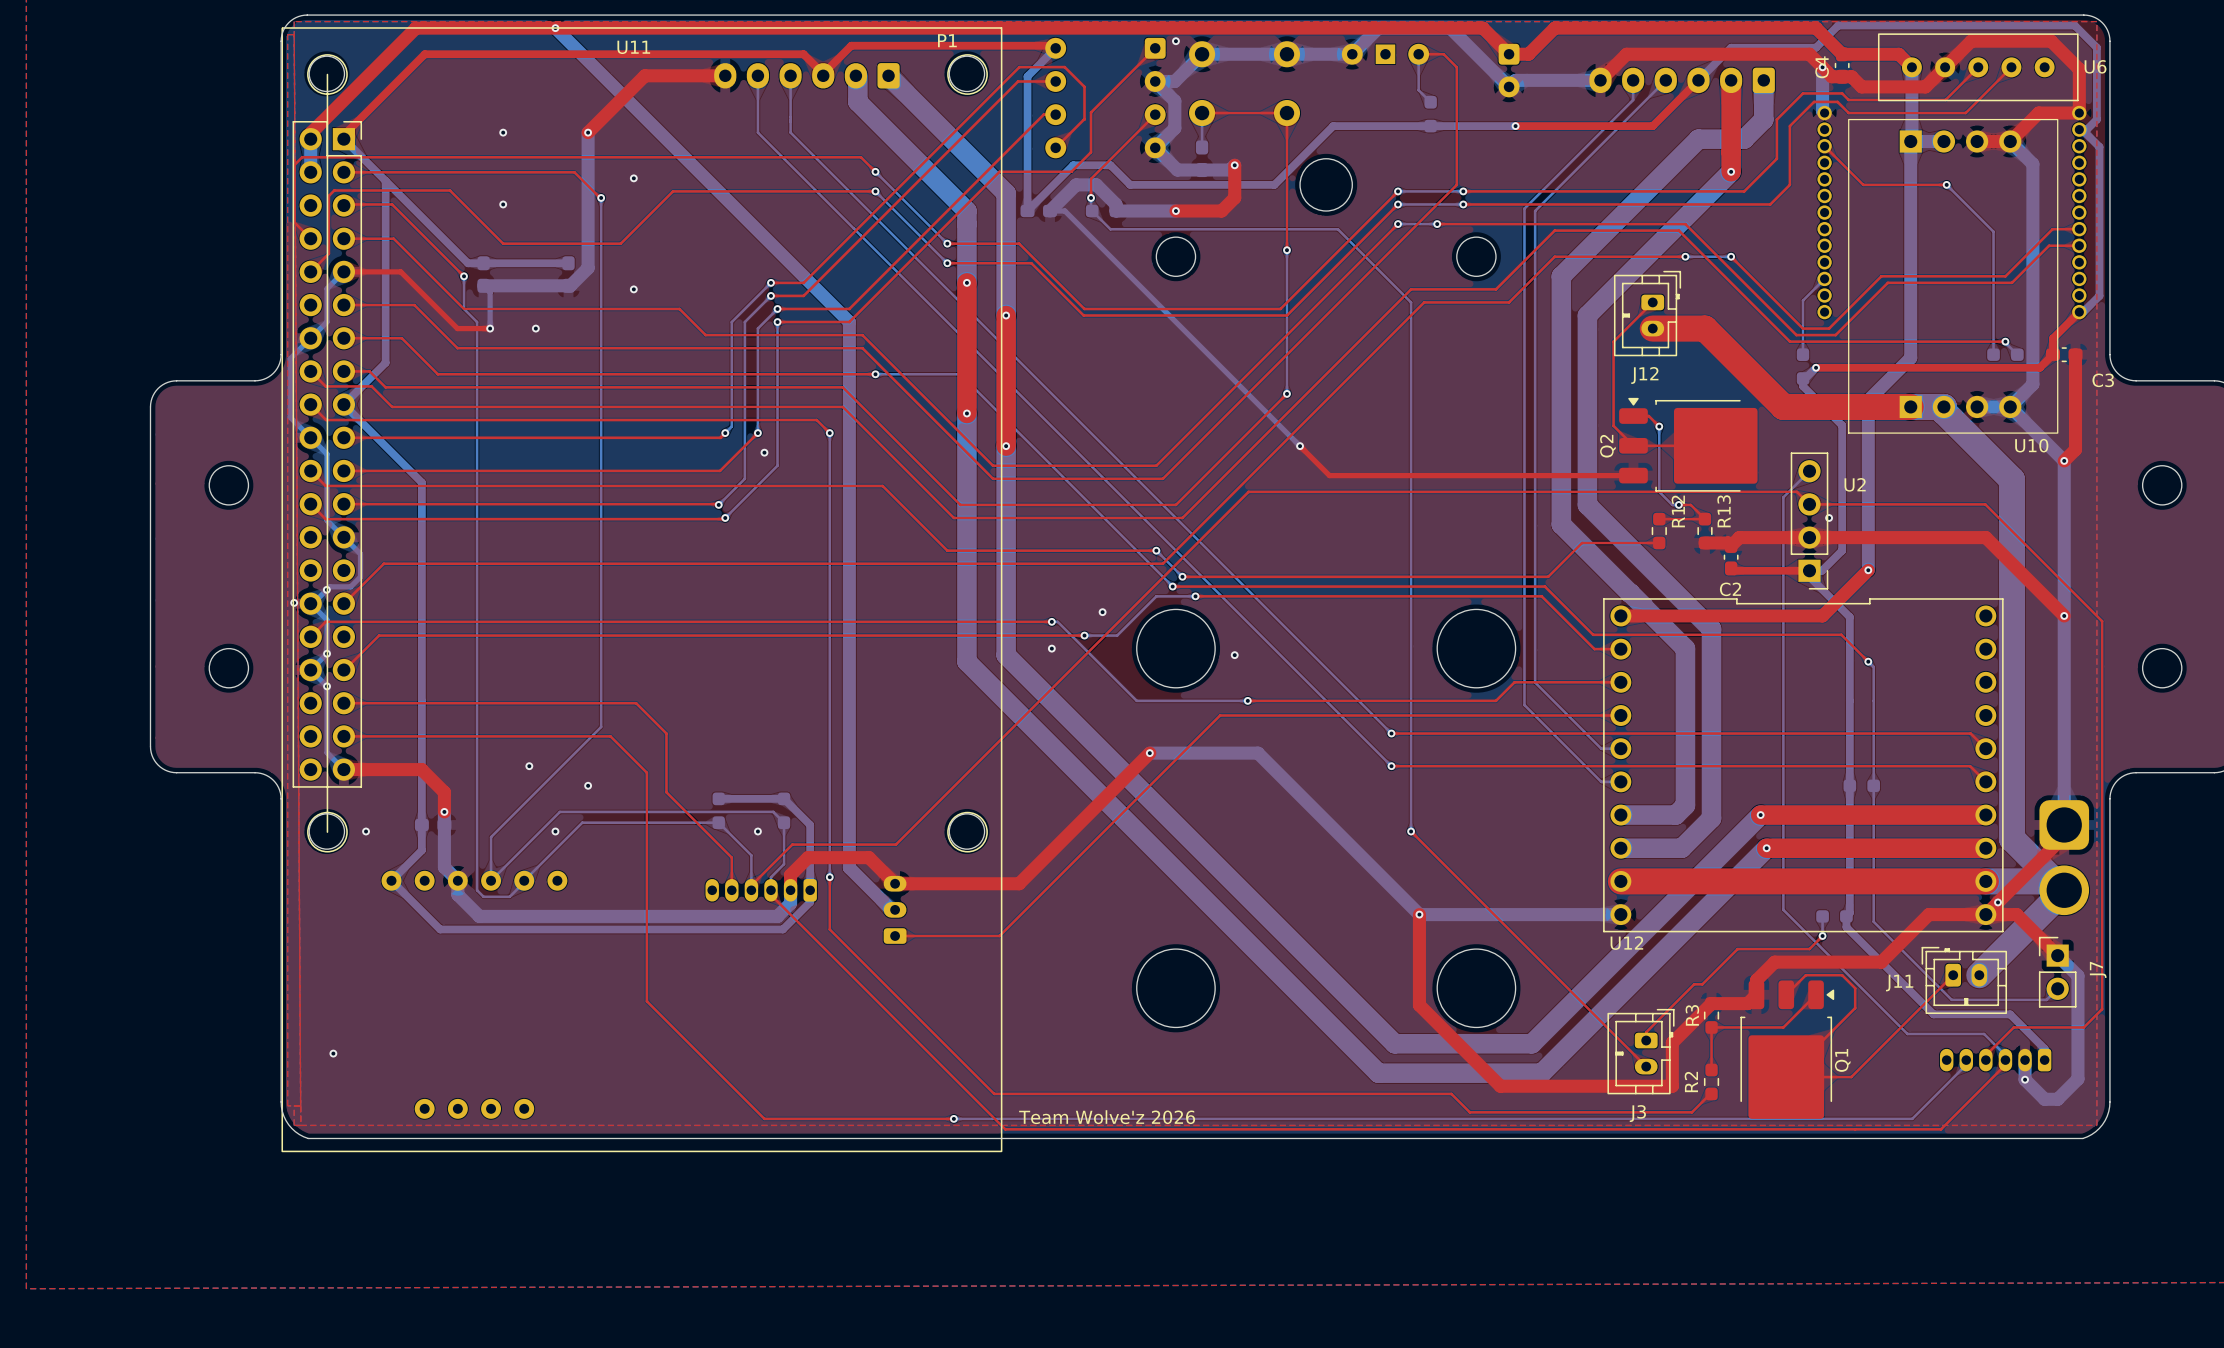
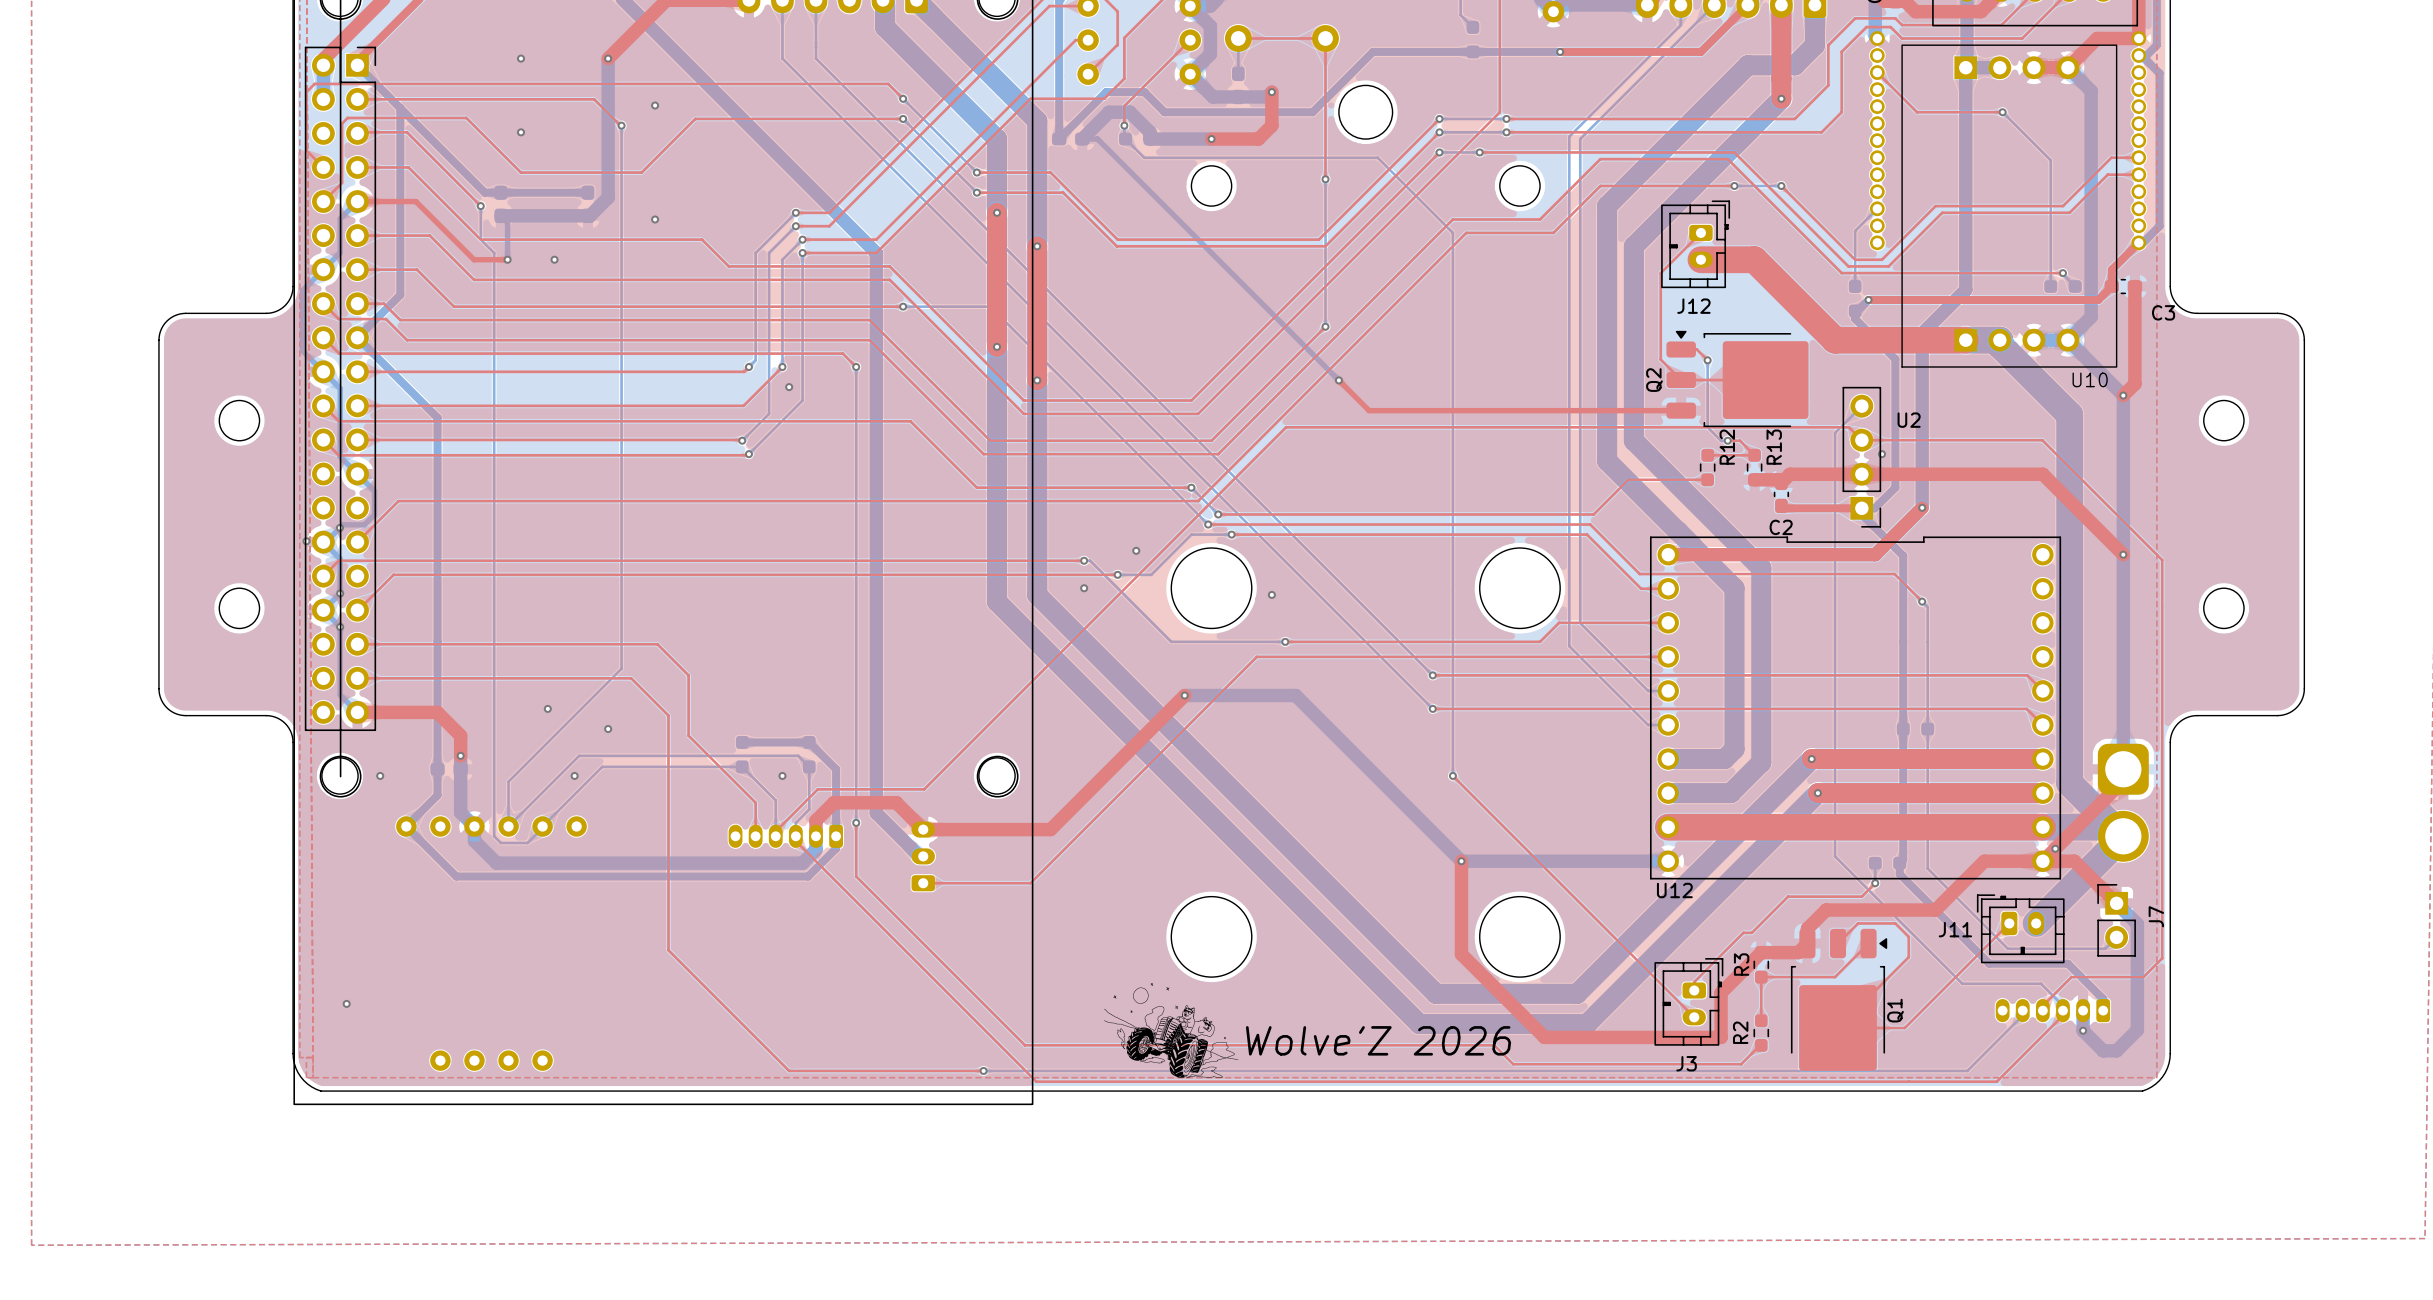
drawing: none -> [1104, 983, 1239, 1079]
text: Team Wolve'z 2026 (1107, 1117) -> Wolve'Z 2026 (1378, 1040)

